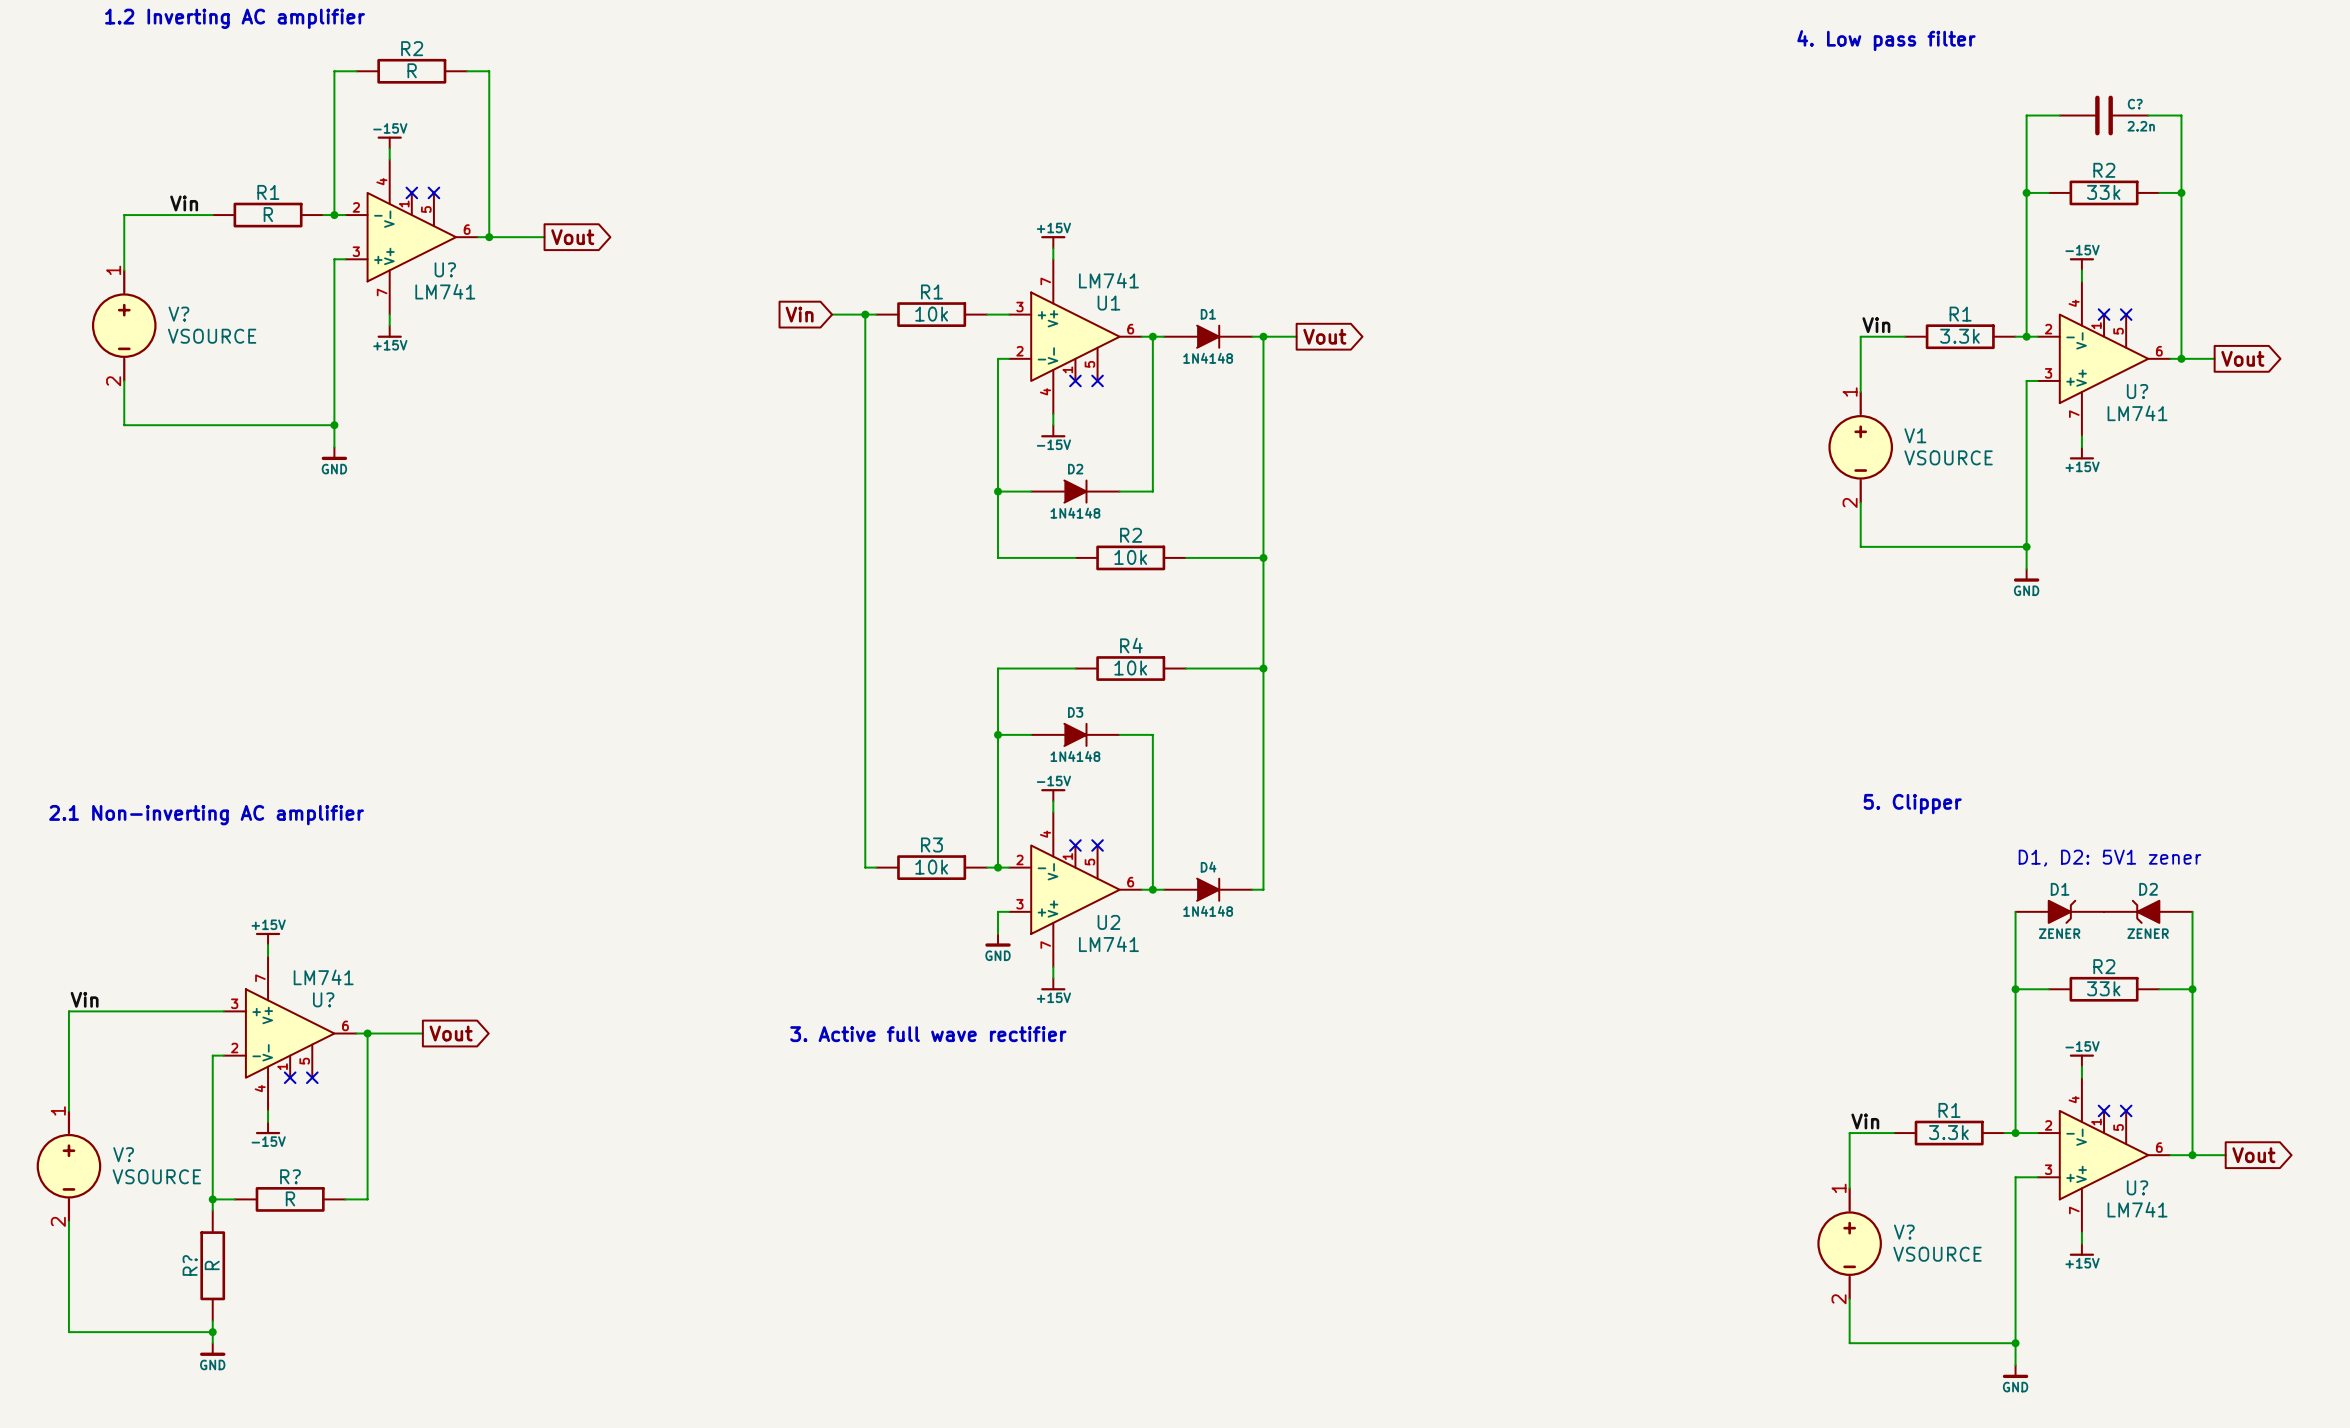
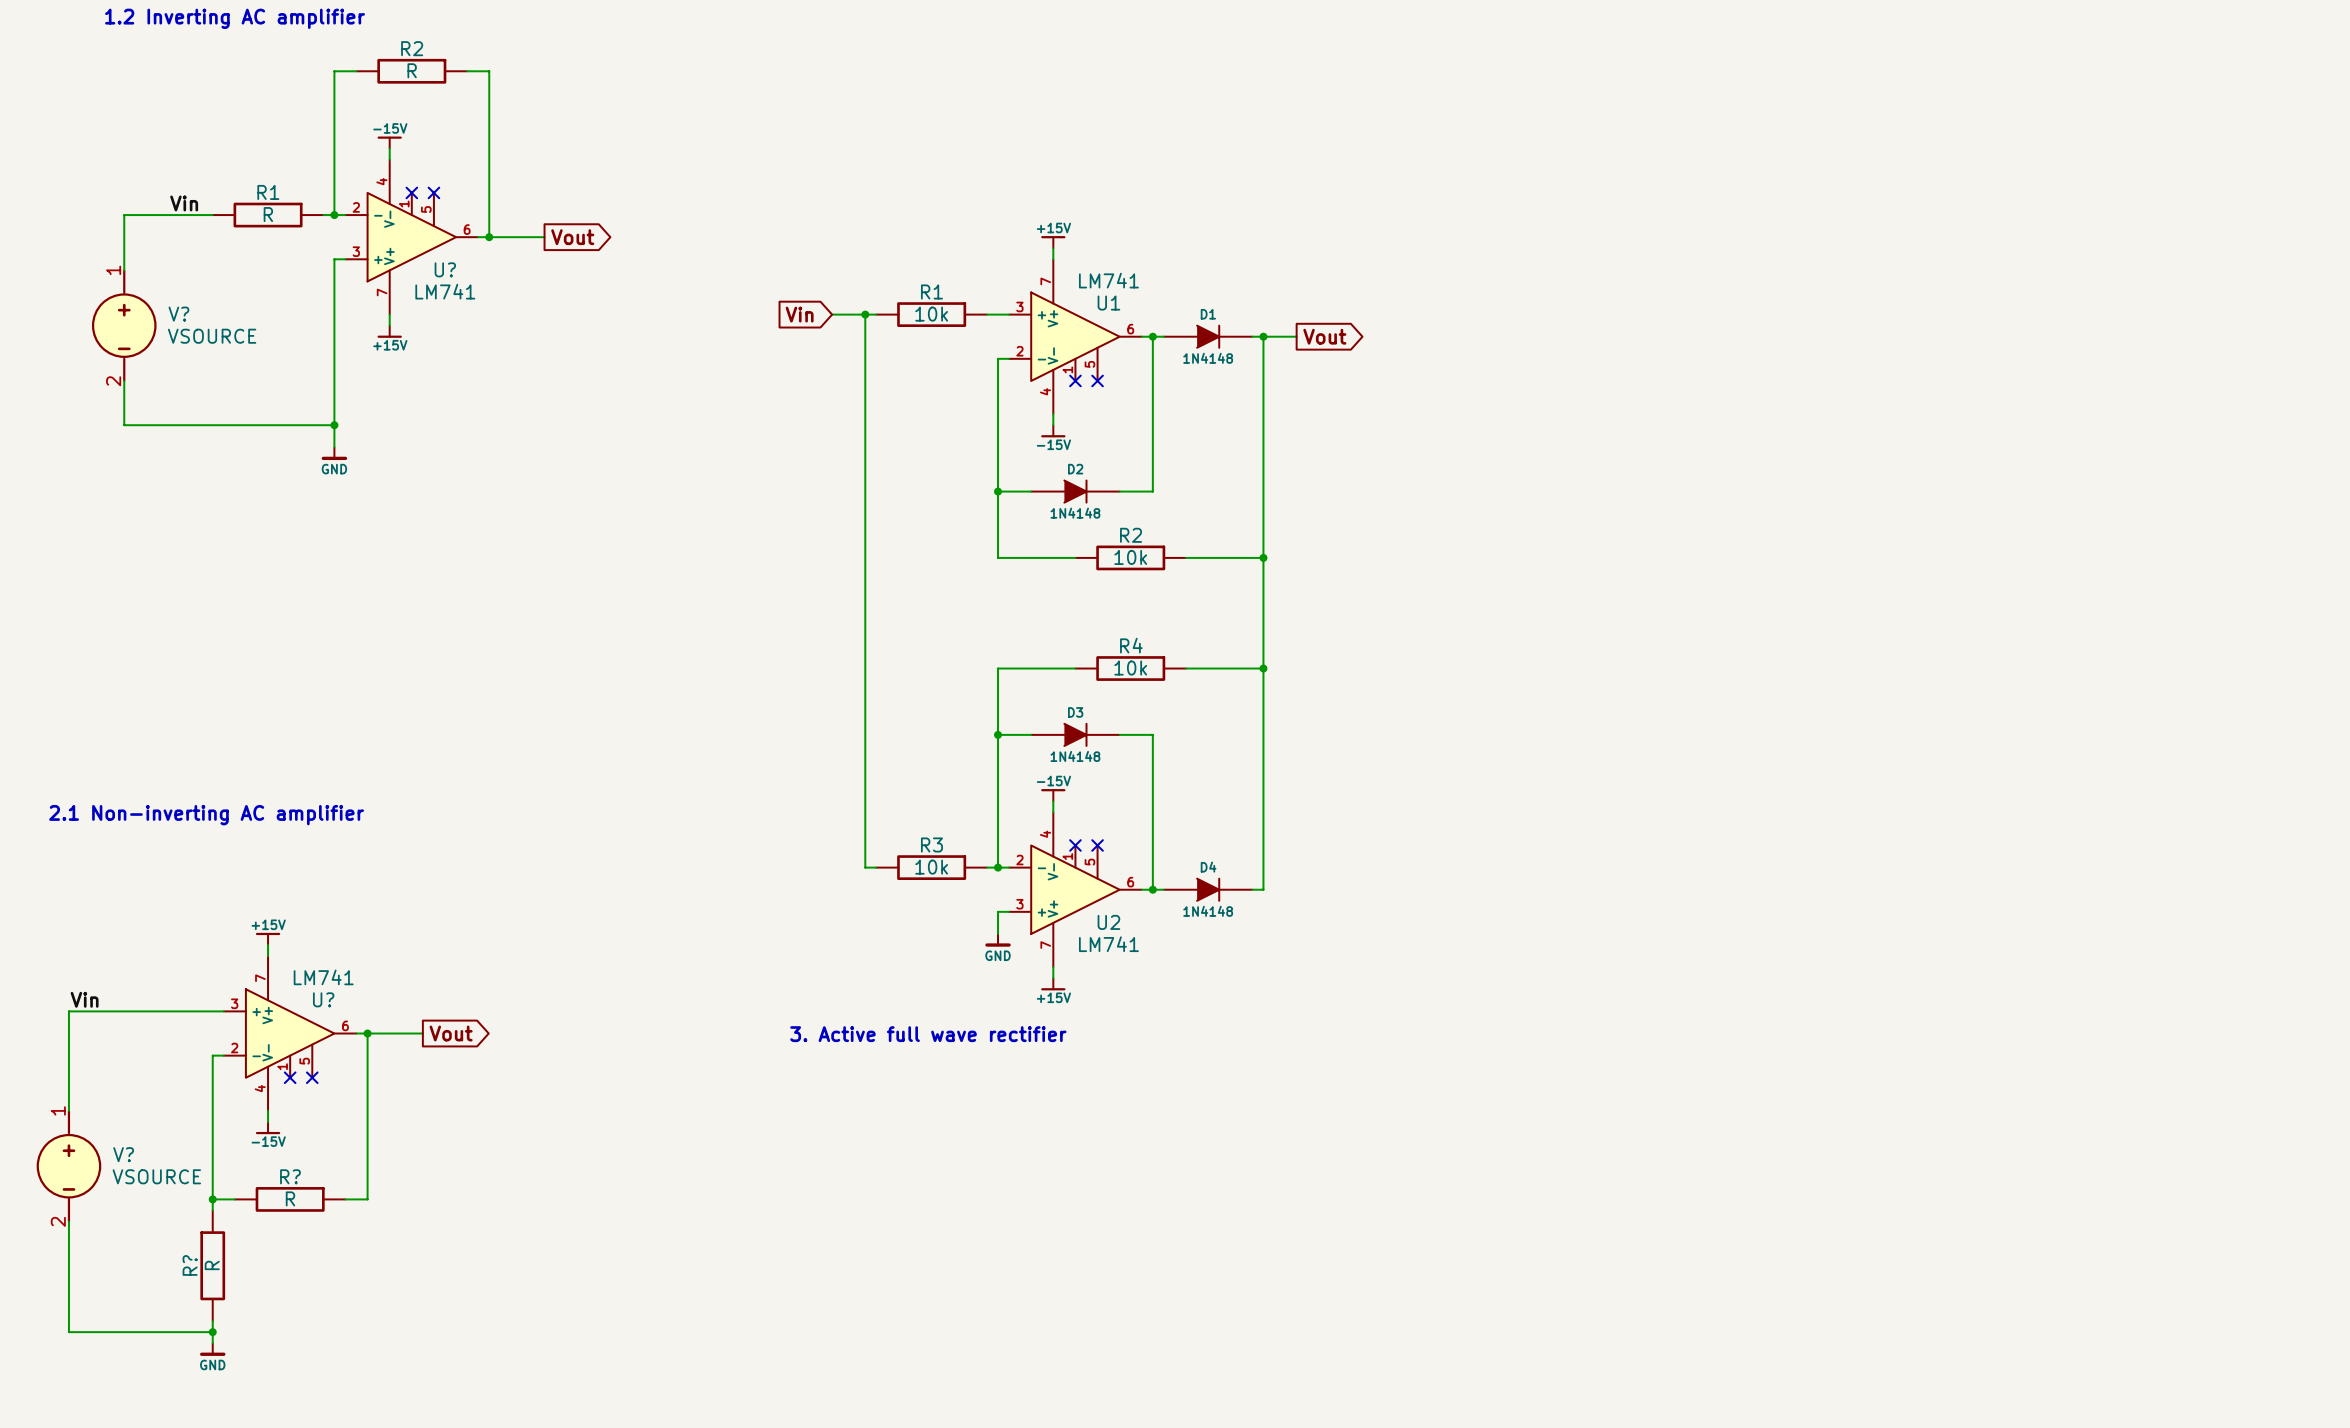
text: 4. Low pass filter (1886, 40) -> none
wire: (2059, 115) (2026, 115) (2026, 336) -> none
C?: 2.2n (2104, 115) -> none
wire: (2148, 115) (2181, 115) (2181, 358) -> none
wire: (2026, 192) (2048, 192) -> none
junction: (2026, 192) -> none
R2: 33k (2104, 192) -> none
wire: (2159, 192) (2181, 192) -> none
junction: (2181, 192) -> none
power symbol: -15V (2081, 264) -> none
wire: (2081, 270) (2081, 281) -> none
no-connect mark: (2104, 314) -> none
no-connect mark: (2126, 314) -> none
label: Vin (1876, 325) -> none
wire: (1904, 336) (1860, 336) (1860, 392) -> none
R1: 3.3k (1960, 336) -> none
wire: (2015, 336) (2037, 336) -> none
junction: (2026, 336) -> none
U?: LM741 (2104, 358) -> none
wire: (2170, 358) (2214, 358) -> none
junction: (2181, 358) -> none
global label: Vout (2242, 358) -> none
wire: (2037, 380) (2026, 380) (2026, 568) -> none
wire: (2081, 436) (2081, 447) -> none
V1: VSOURCE (1860, 447) -> none
power symbol: +15V (2081, 453) -> none
wire: (1860, 502) (1860, 546) (2026, 546) -> none
junction: (2026, 546) -> none
power symbol: GND (2026, 575) -> none
text: 5. Clipper (1912, 804) -> none
text: D1, D2: 5V1 zener (2109, 858) -> none
wire: (2015, 911) (2015, 1133) -> none
D1: ZENER (2059, 911) -> none
D2: ZENER (2148, 911) -> none
wire: (2192, 911) (2192, 1155) -> none
wire: (2015, 989) (2048, 989) -> none
junction: (2015, 989) -> none
R2: 33k (2104, 989) -> none
wire: (2159, 989) (2192, 989) -> none
junction: (2192, 989) -> none
power symbol: -15V (2081, 1060) -> none
wire: (2081, 1066) (2081, 1077) -> none
no-connect mark: (2104, 1110) -> none
no-connect mark: (2126, 1110) -> none
label: Vin (1865, 1121) -> none
wire: (1893, 1133) (1849, 1133) (1849, 1188) -> none
R1: 3.3k (1949, 1133) -> none
wire: (2004, 1133) (2037, 1133) -> none
junction: (2015, 1133) -> none
U?: LM741 (2104, 1155) -> none
wire: (2170, 1155) (2225, 1155) -> none
junction: (2192, 1155) -> none
global label: Vout (2253, 1155) -> none
wire: (2037, 1177) (2015, 1177) (2015, 1365) -> none
wire: (2081, 1232) (2081, 1243) -> none
V?: VSOURCE (1849, 1243) -> none
power symbol: +15V (2081, 1249) -> none
wire: (1849, 1298) (1849, 1343) (2015, 1343) -> none
junction: (2015, 1343) -> none
power symbol: GND (2015, 1371) -> none

